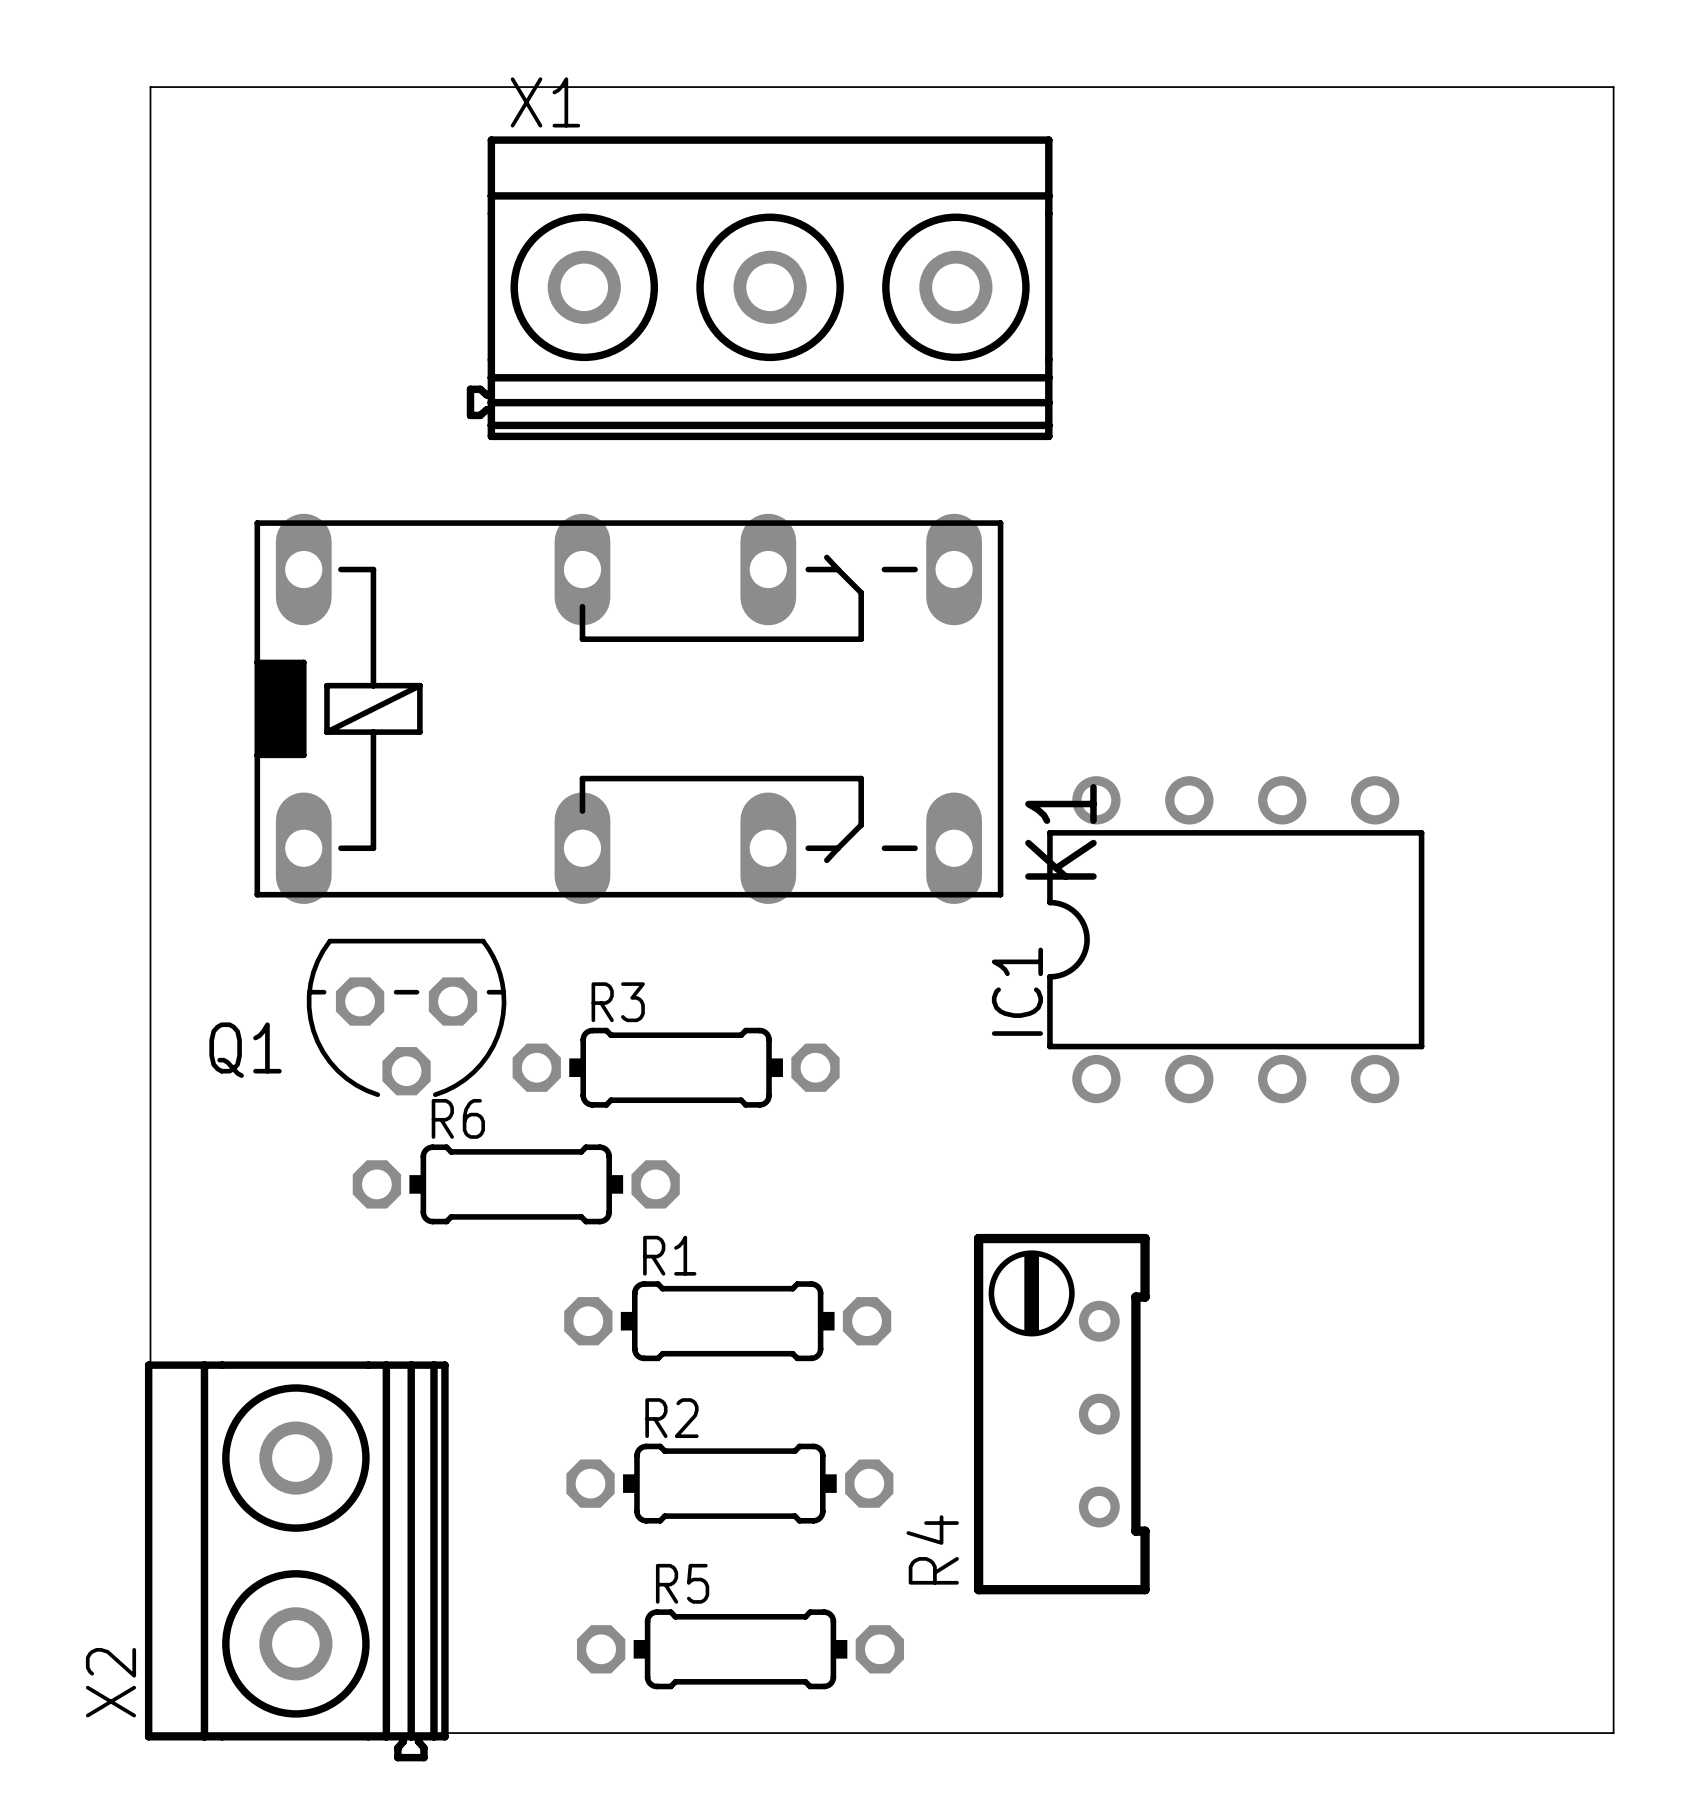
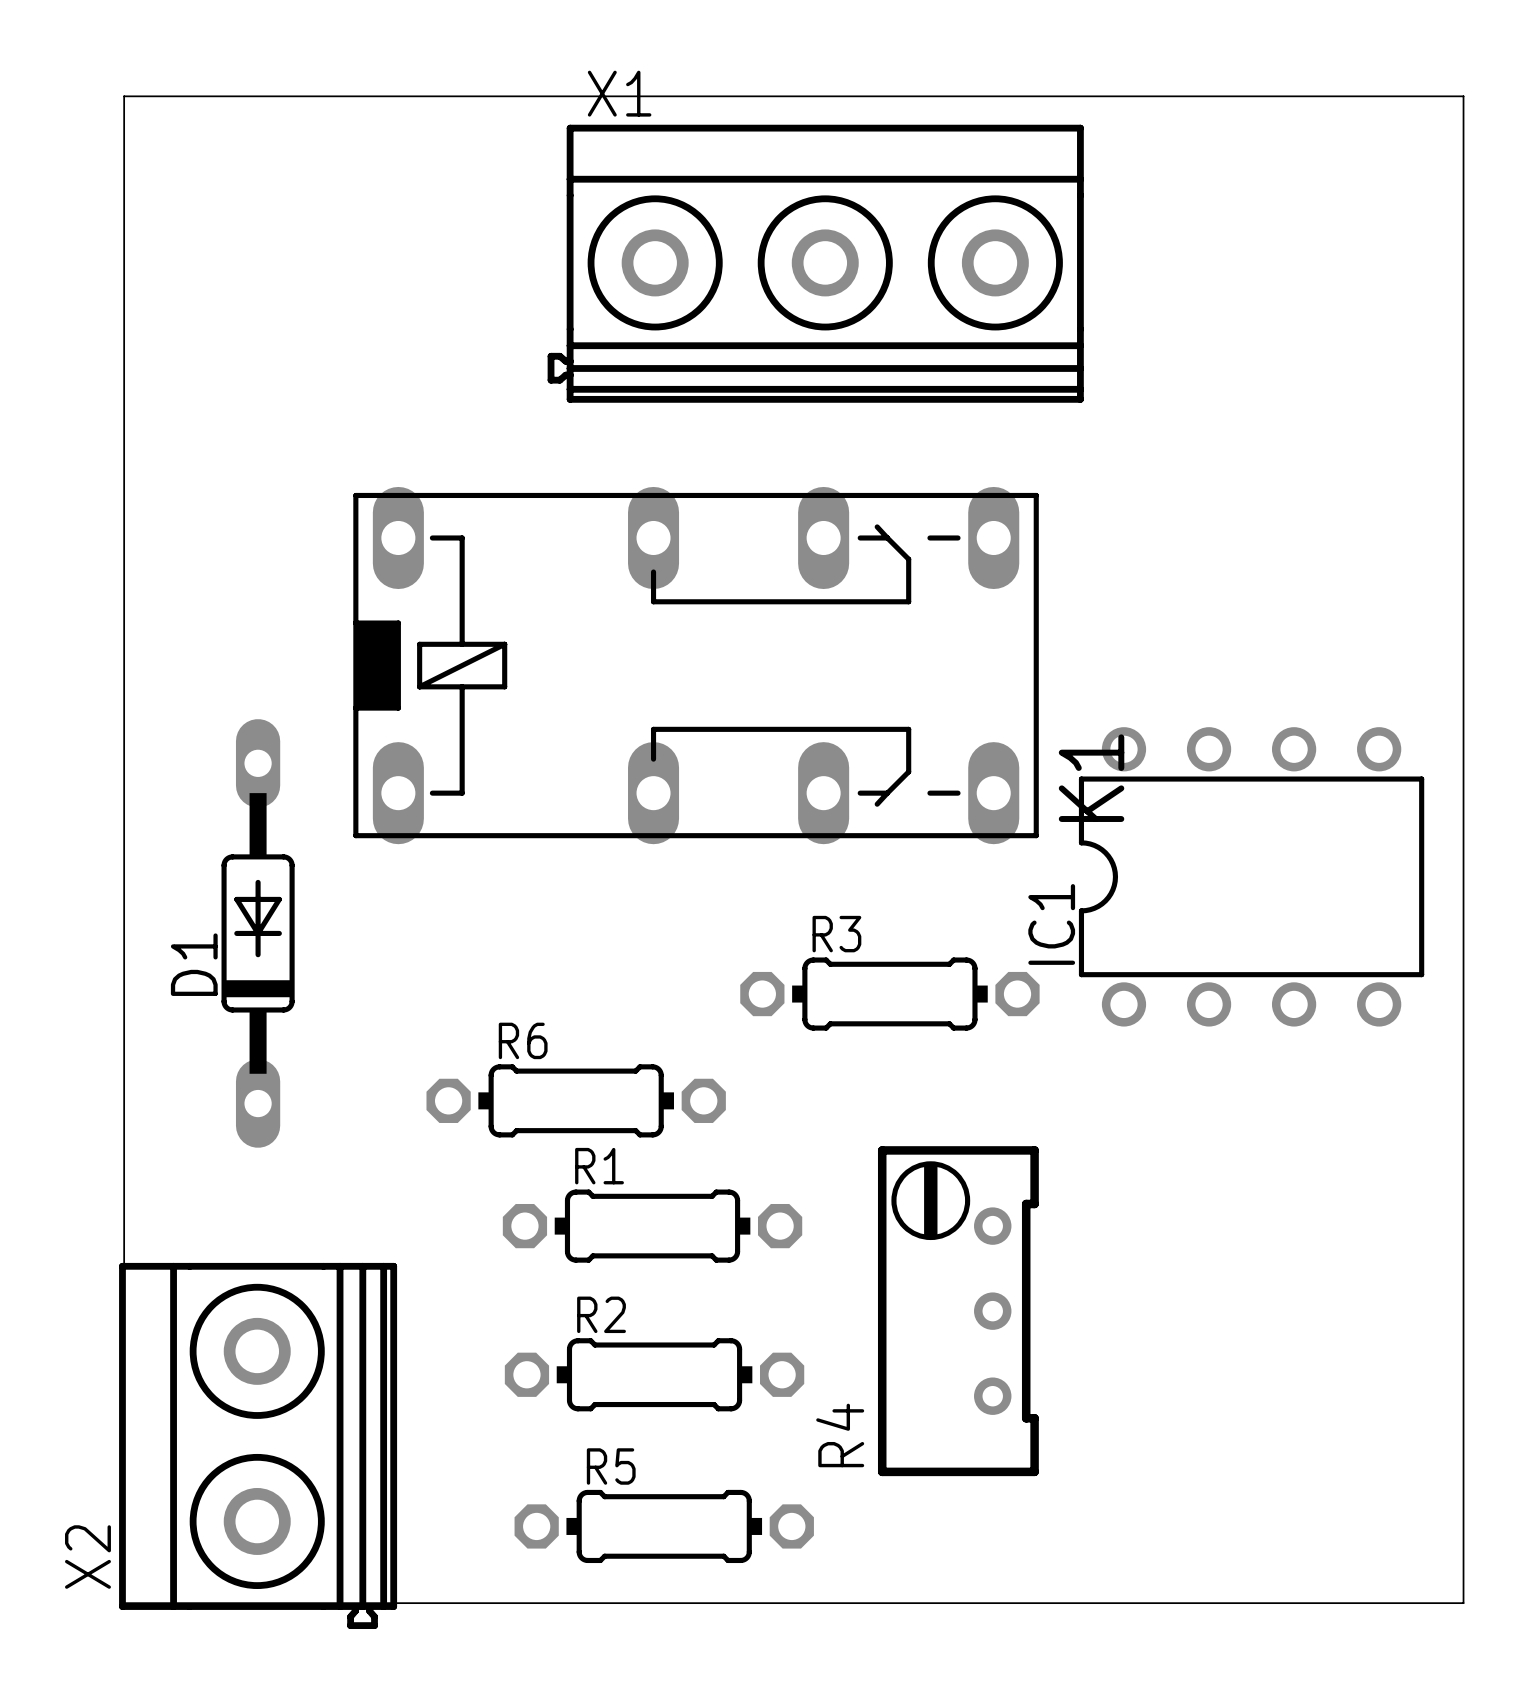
X1 position: (759, 288) -> (815, 263)
K1 position: (628, 708) -> (696, 665)
IC1 position: (1235, 939) -> (1251, 876)
D1: none -> (258, 933)
Q1: (406, 1017) -> none
R3 position: (676, 1067) -> (889, 994)
R6 position: (516, 1184) -> (576, 1100)

